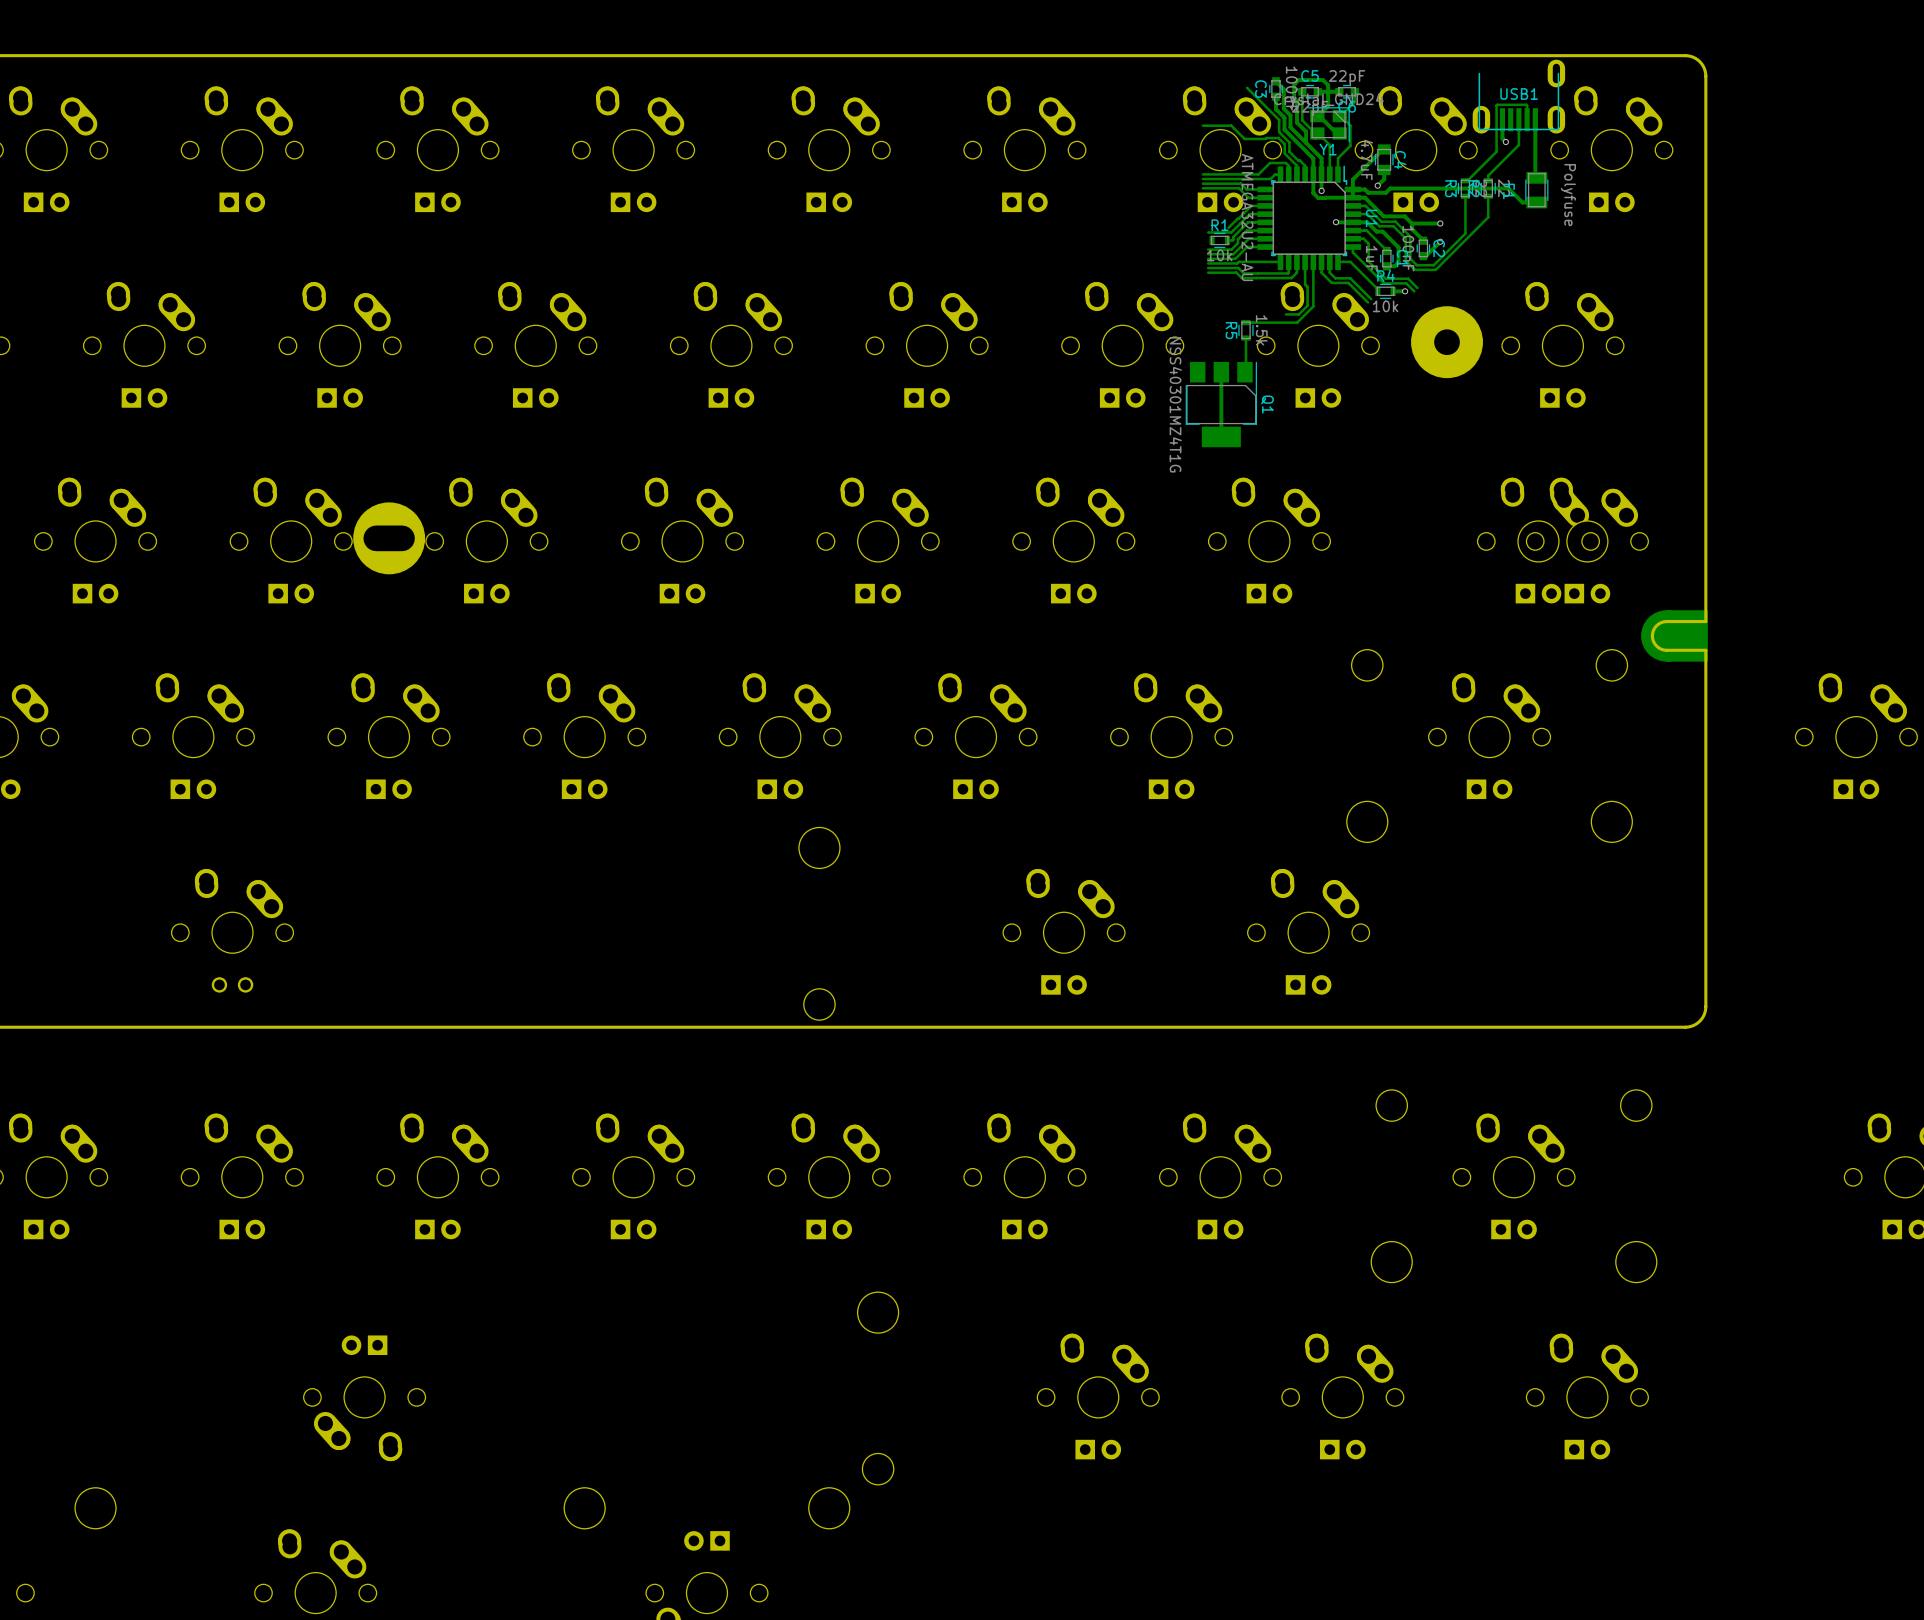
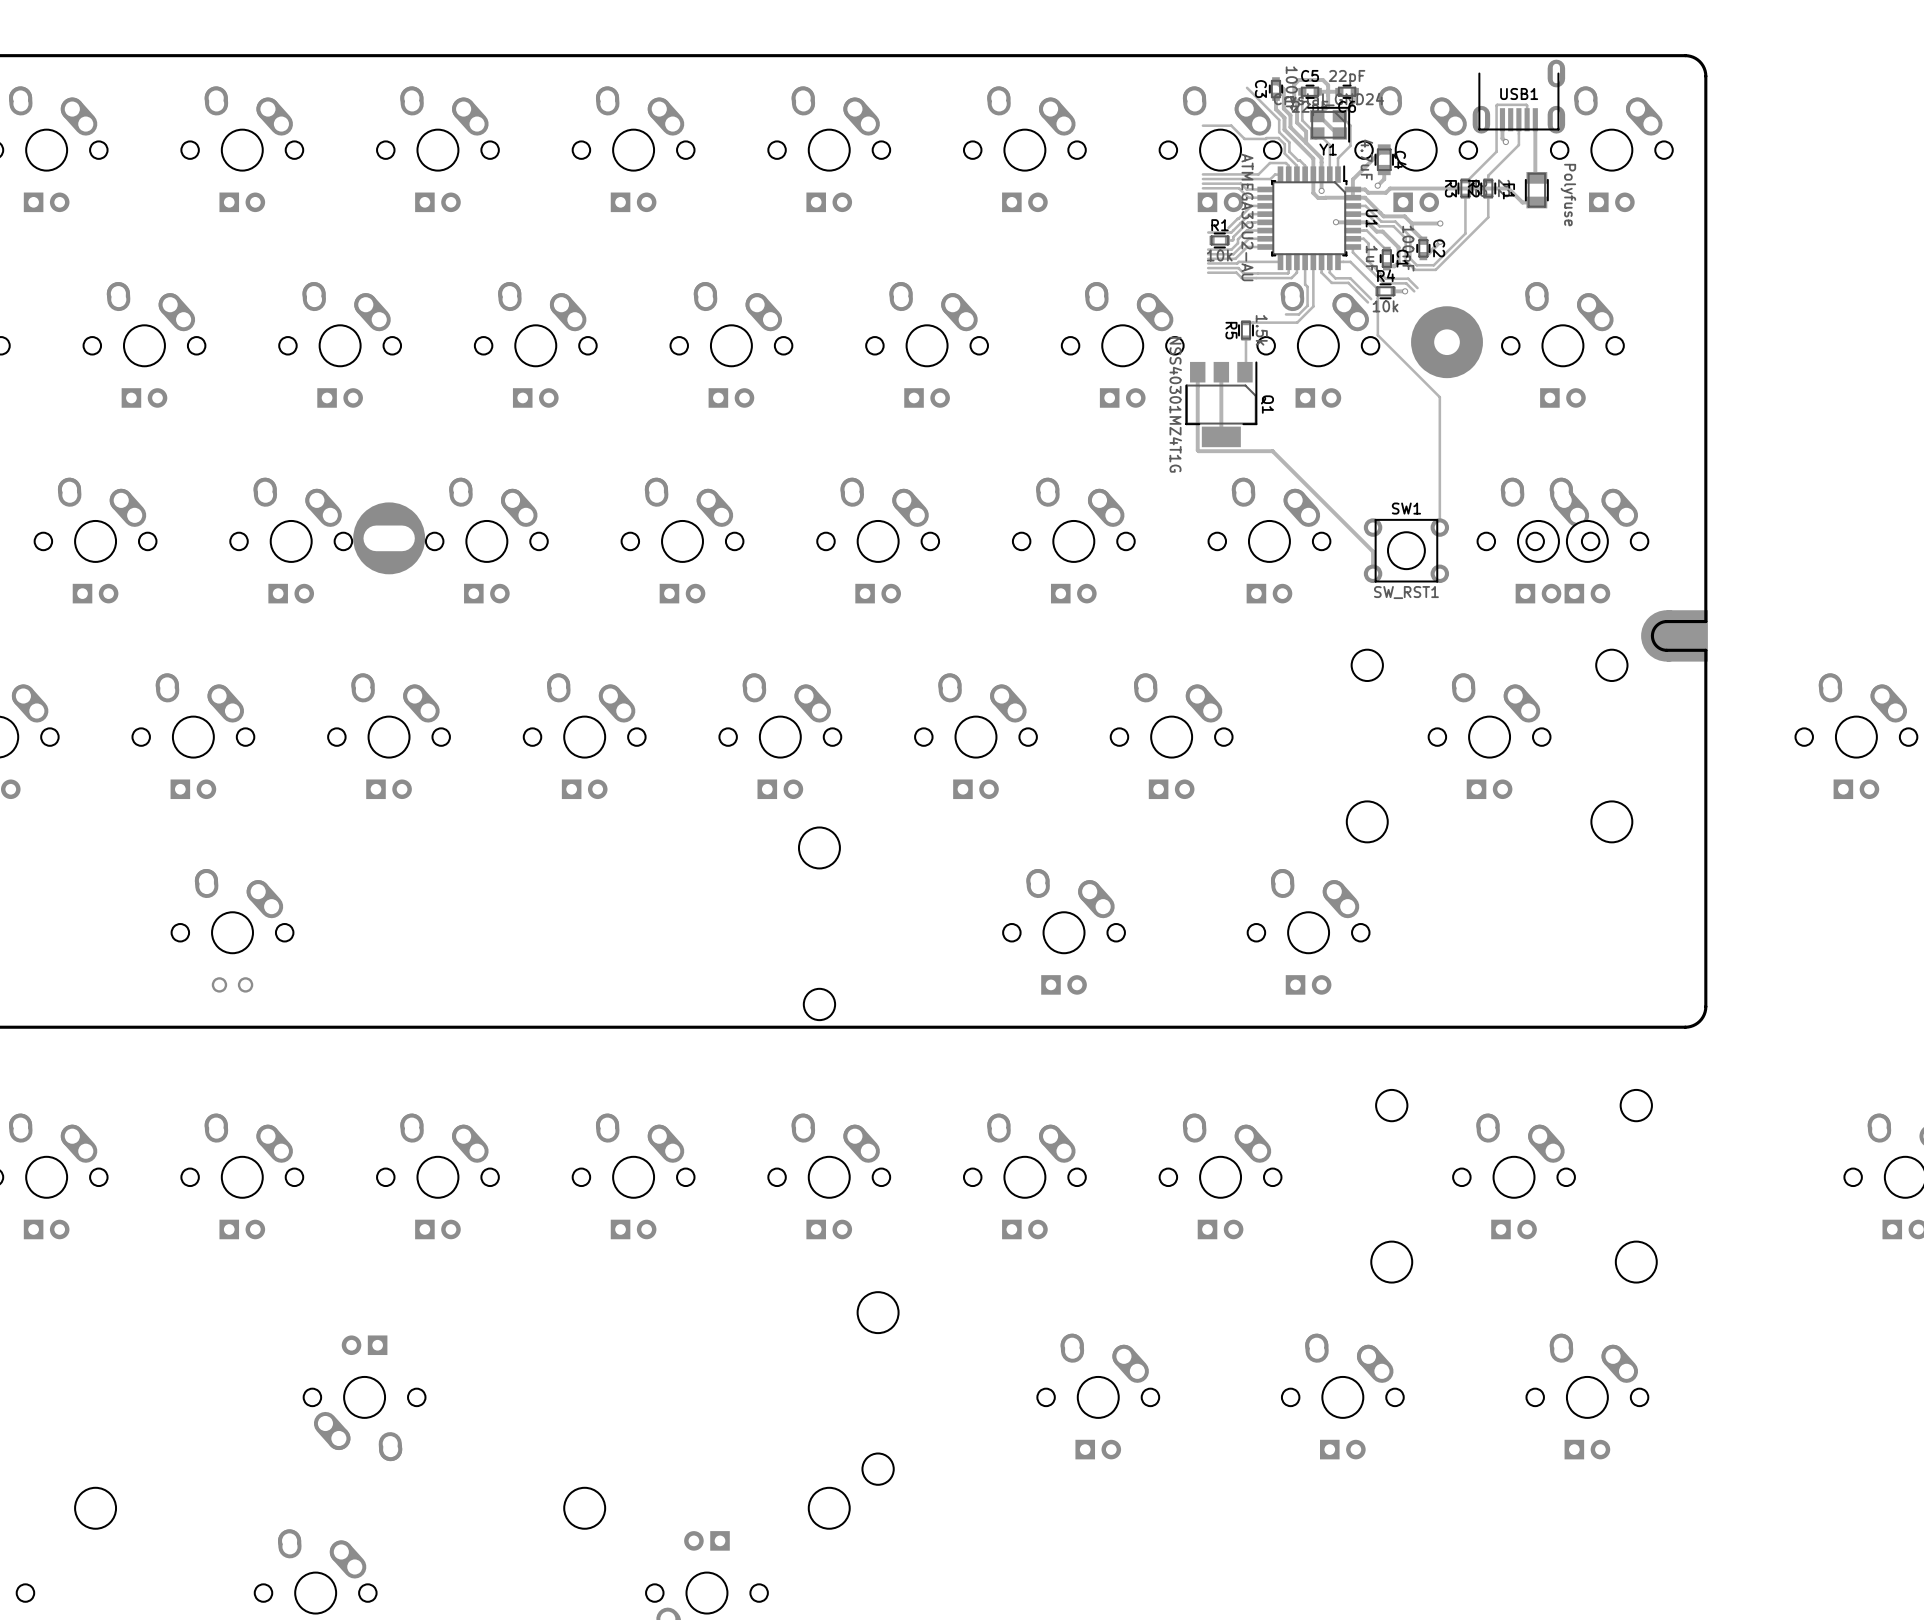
track: none -> (1377, 291) (1377, 335) (1439, 397) (1439, 527)
track: none -> (1197, 372) (1197, 450) (1272, 451) (1373, 551) (1373, 573)
SW1: none -> SW_RST1 (1406, 550)

